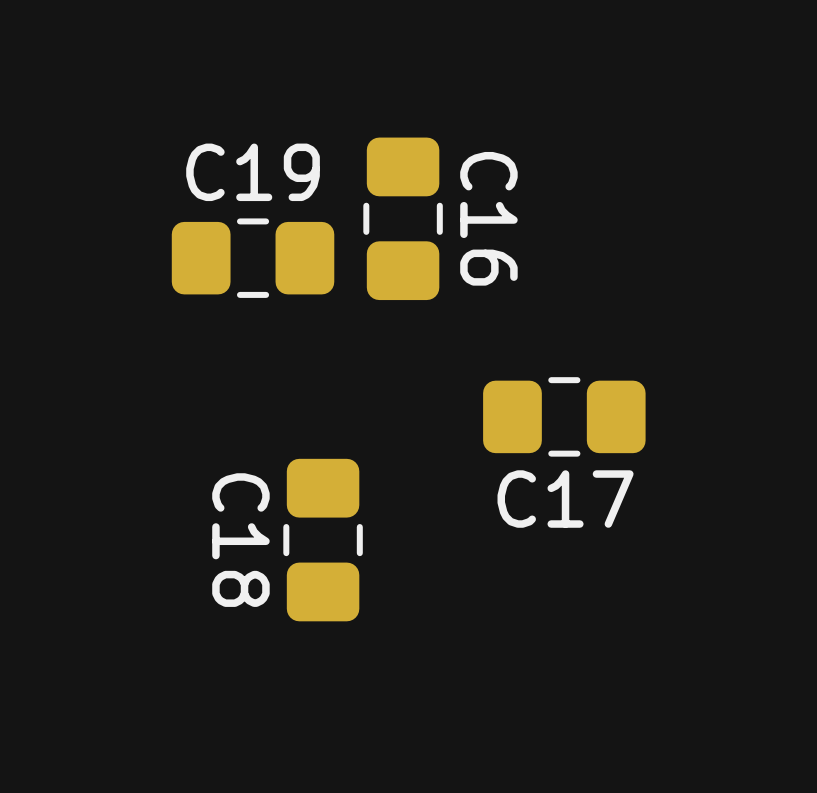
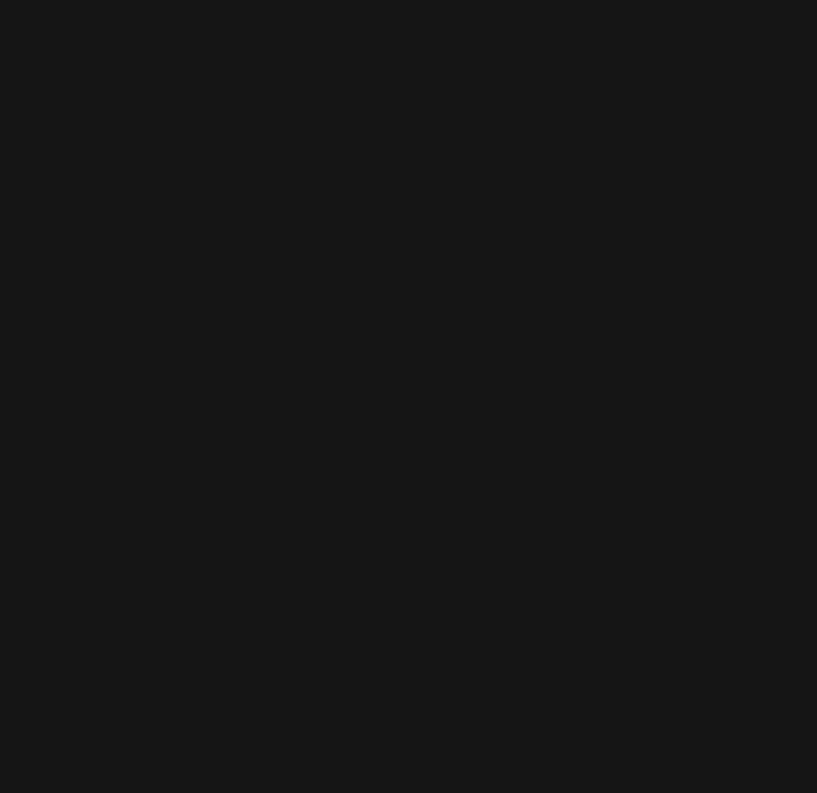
C16: (403, 218) -> none
C19: (253, 258) -> none
C17: (564, 416) -> none
C18: (323, 540) -> none

